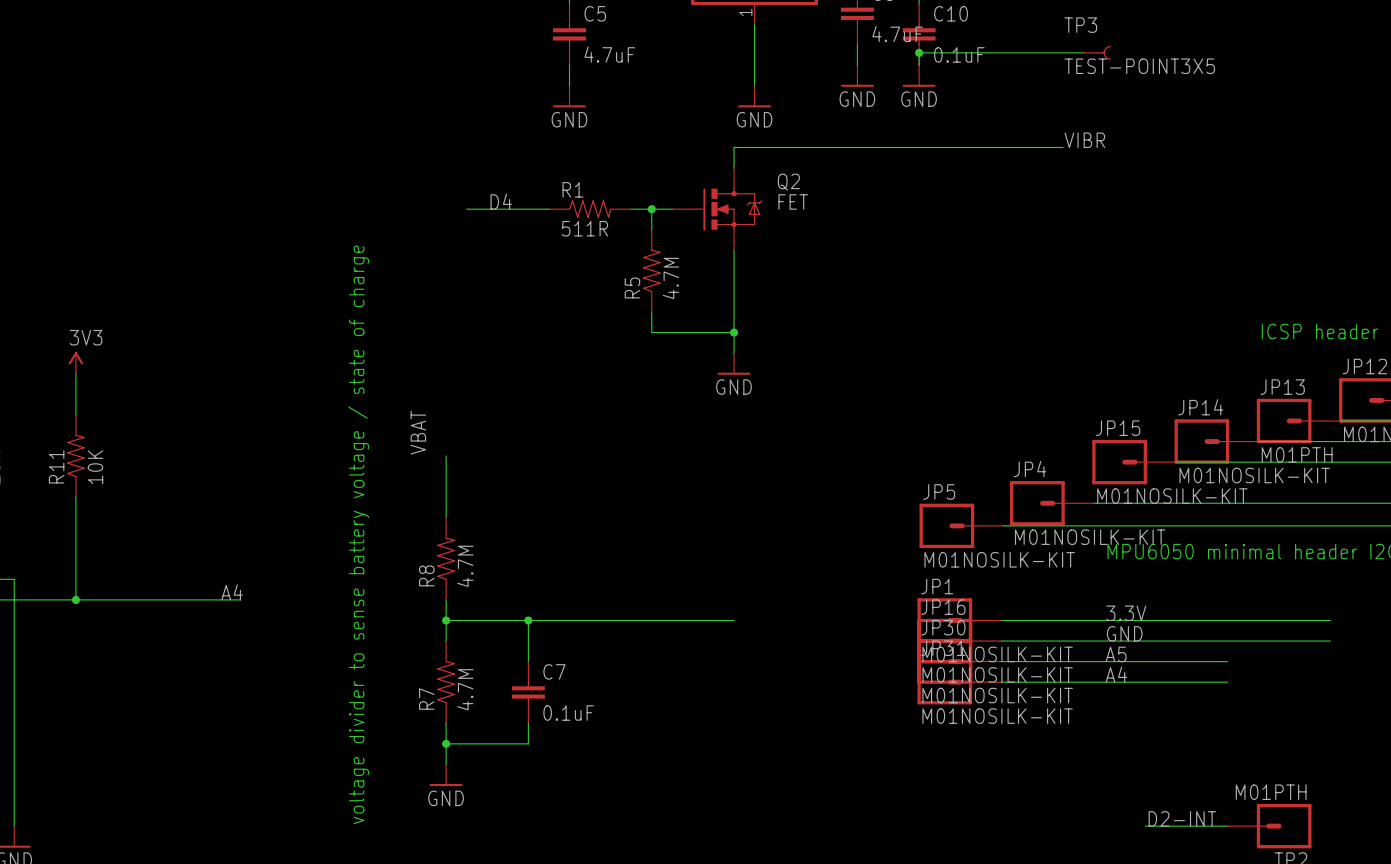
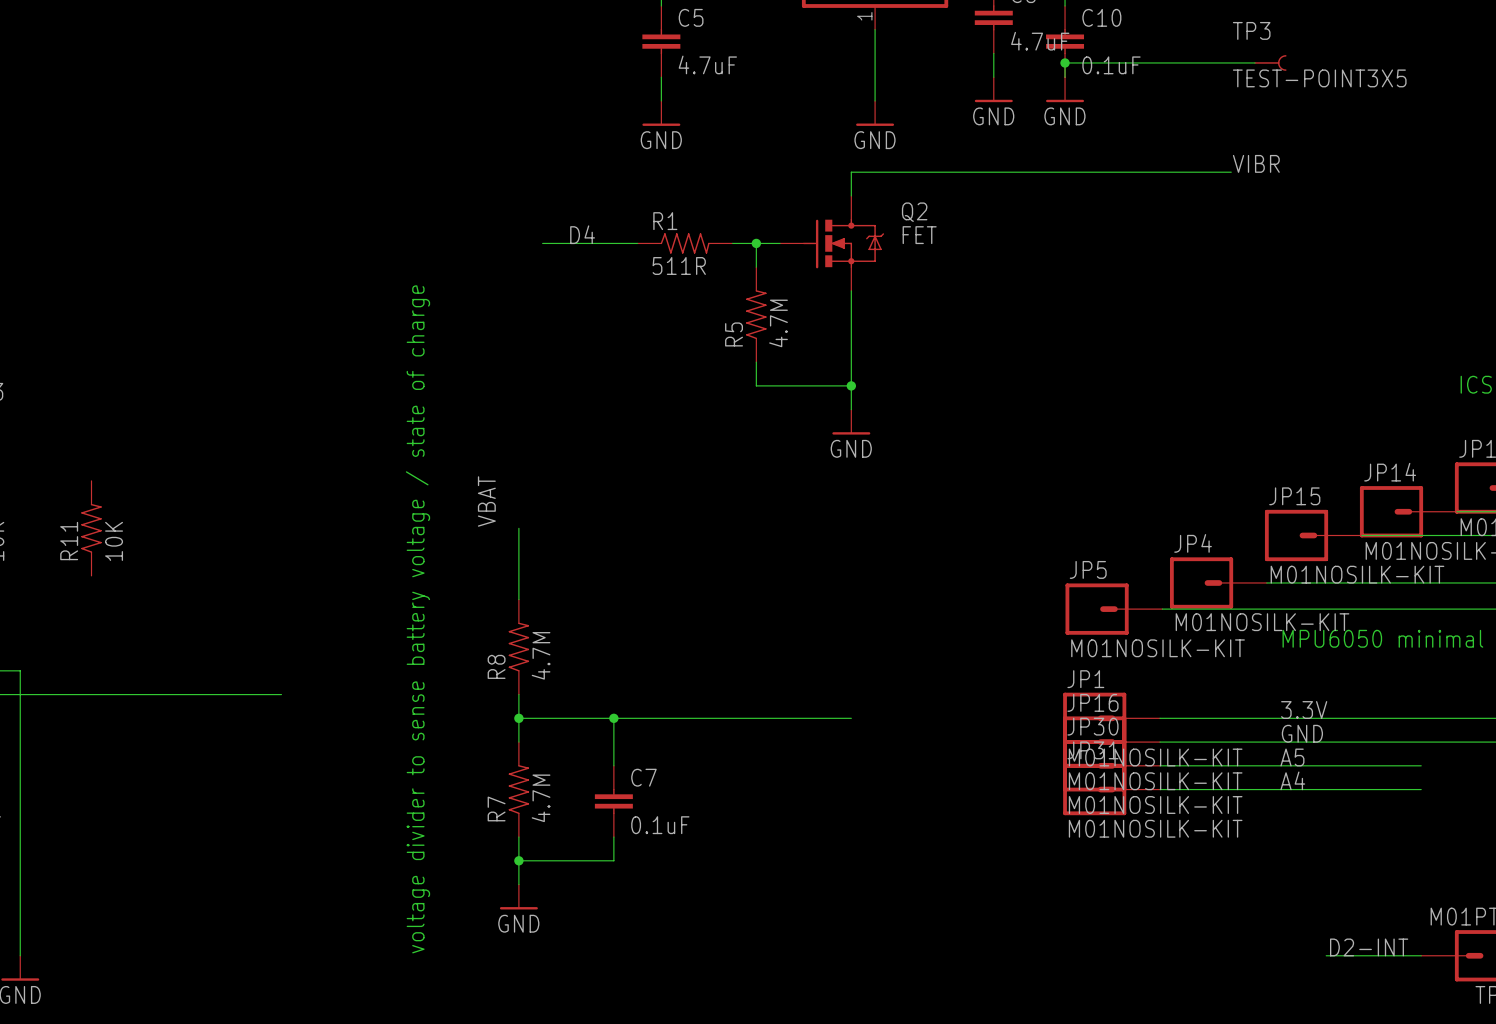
power symbol: 3V3 (75, 362) -> none
wire: (75, 373) (75, 414) -> none
wire: (75, 497) (75, 599) -> none
label: A4 (232, 592) -> none
junction: (75, 599) -> none

